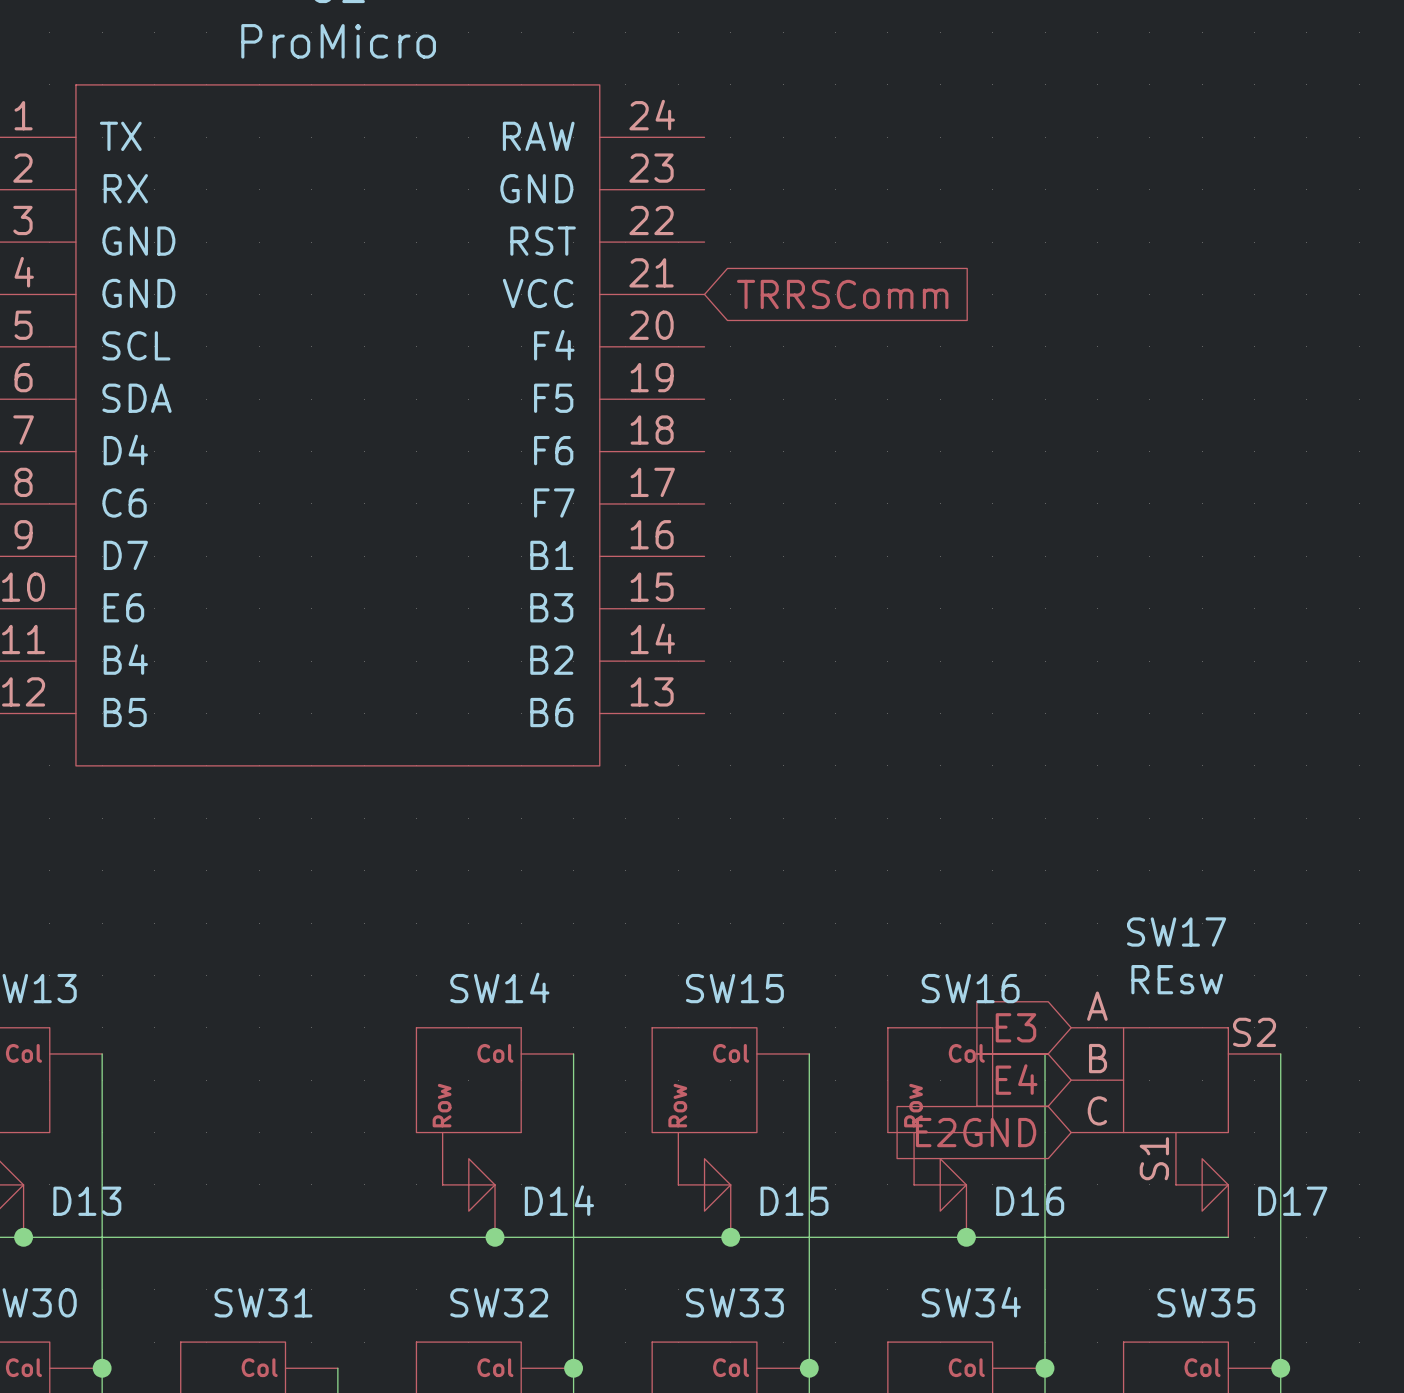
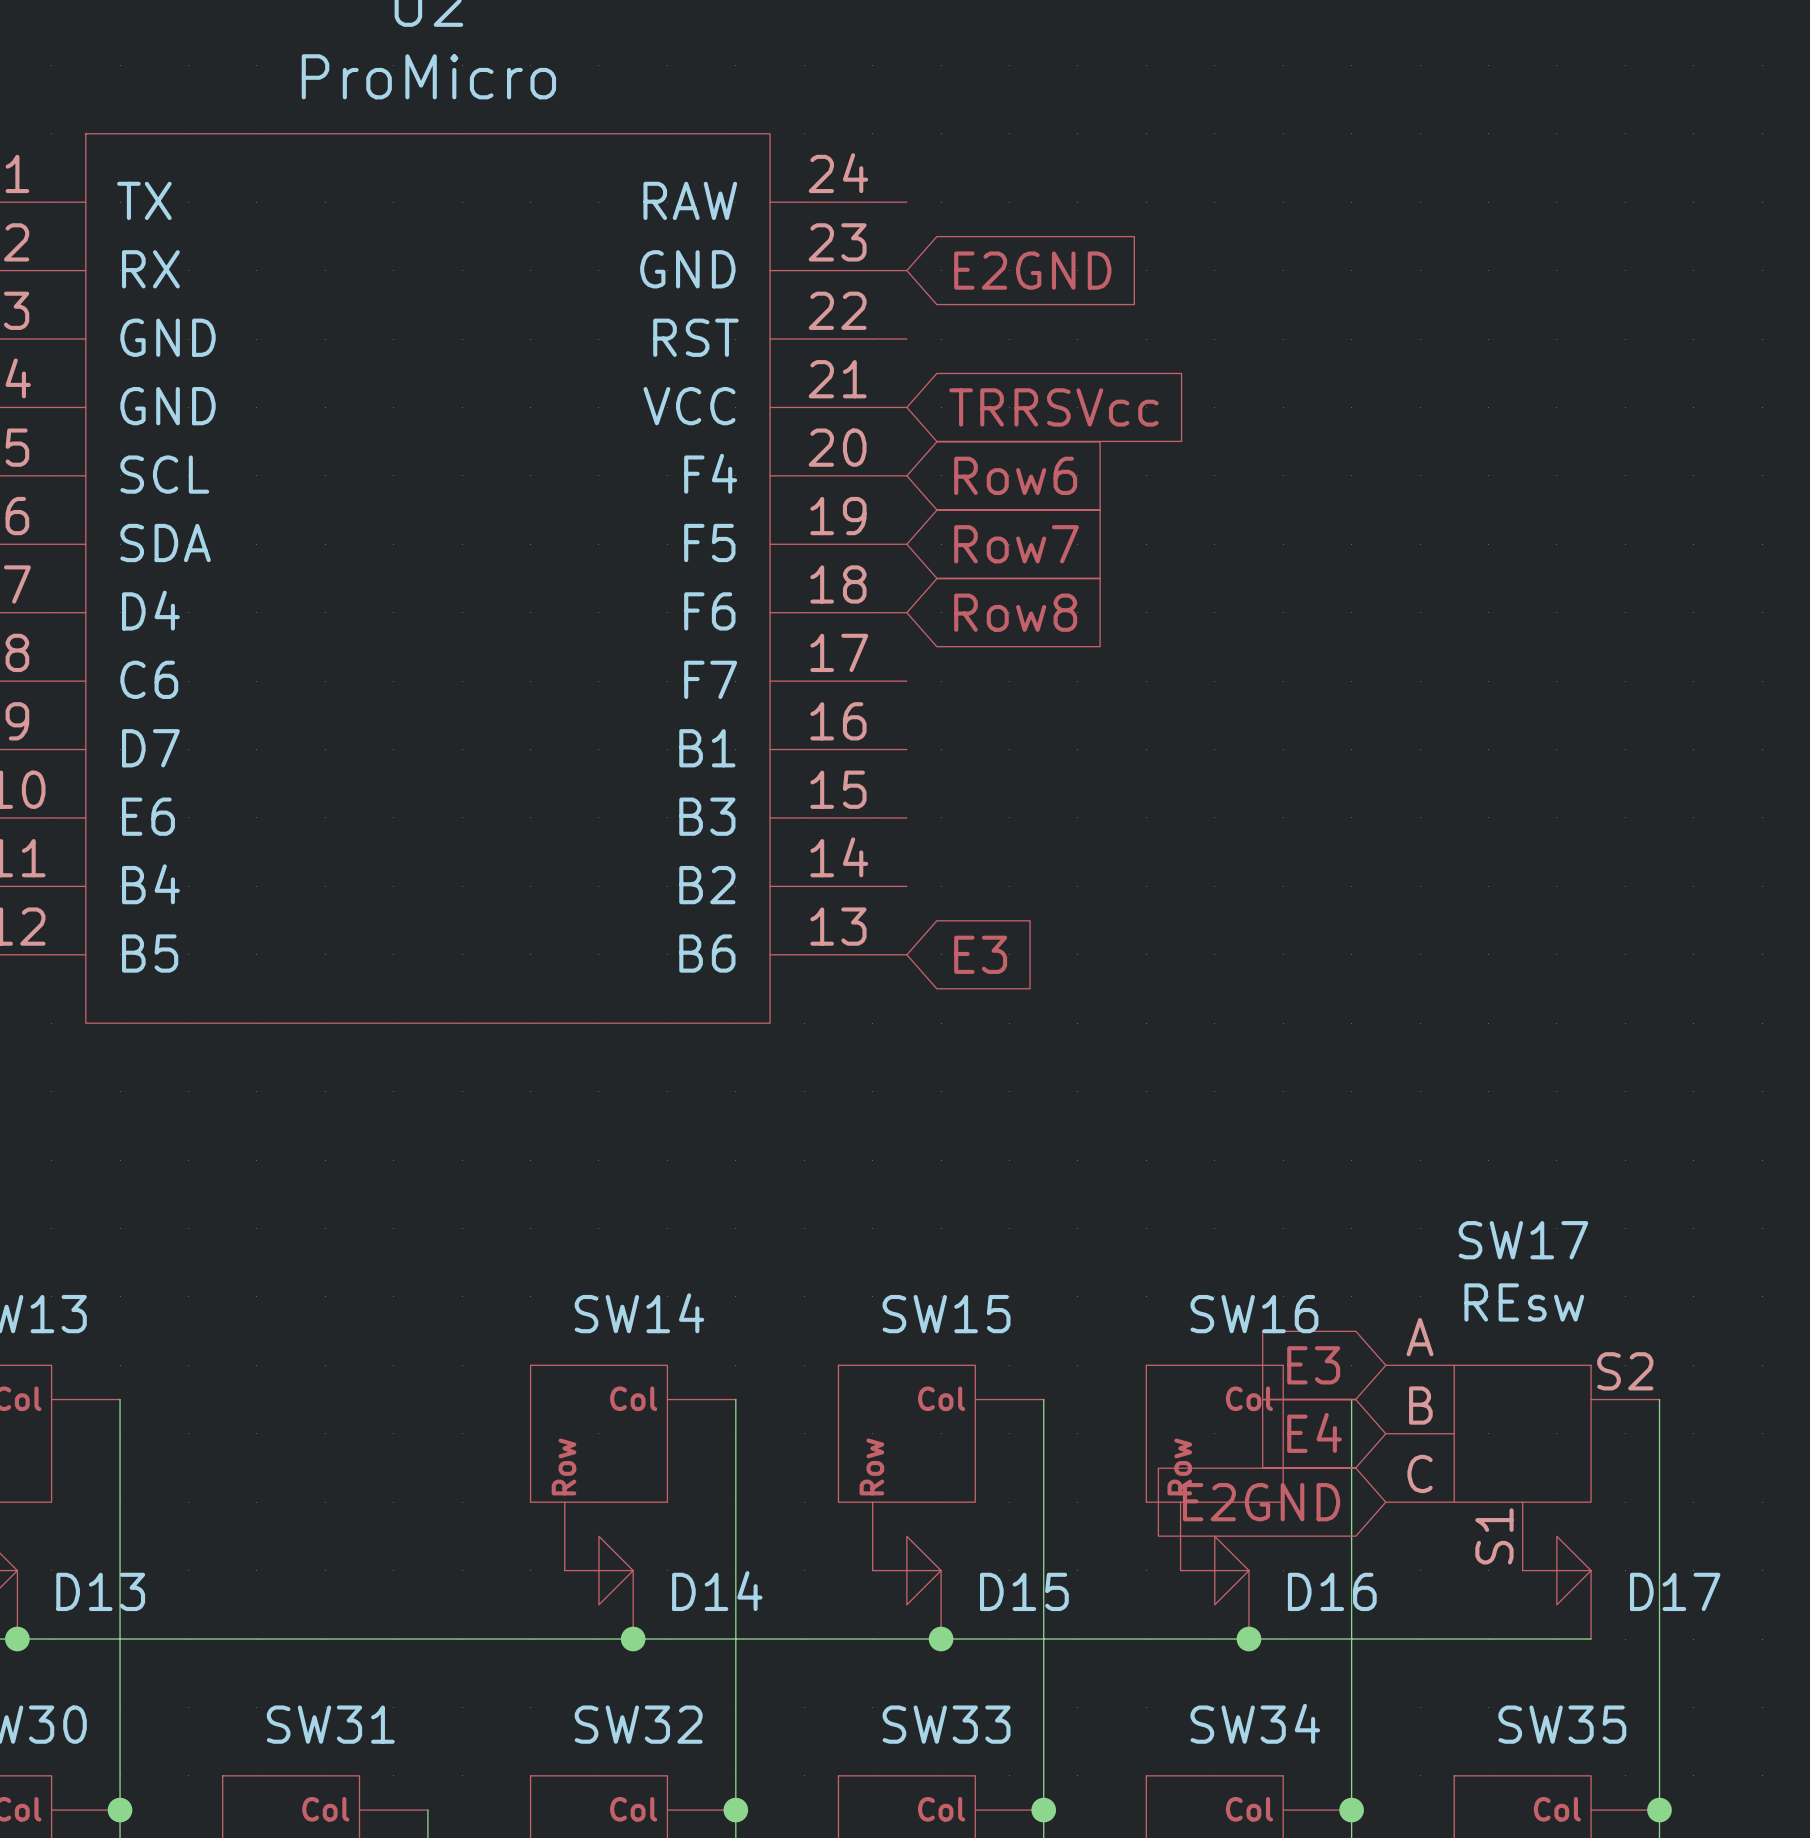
global label: none -> E2GND (1032, 270)
global label: TRRSComm (842, 294) -> TRRSVcc (1053, 407)
global label: none -> Row6 (1015, 475)
global label: none -> Row7 (1016, 544)
global label: none -> Row8 (1015, 612)
global label: none -> E3 (980, 954)

